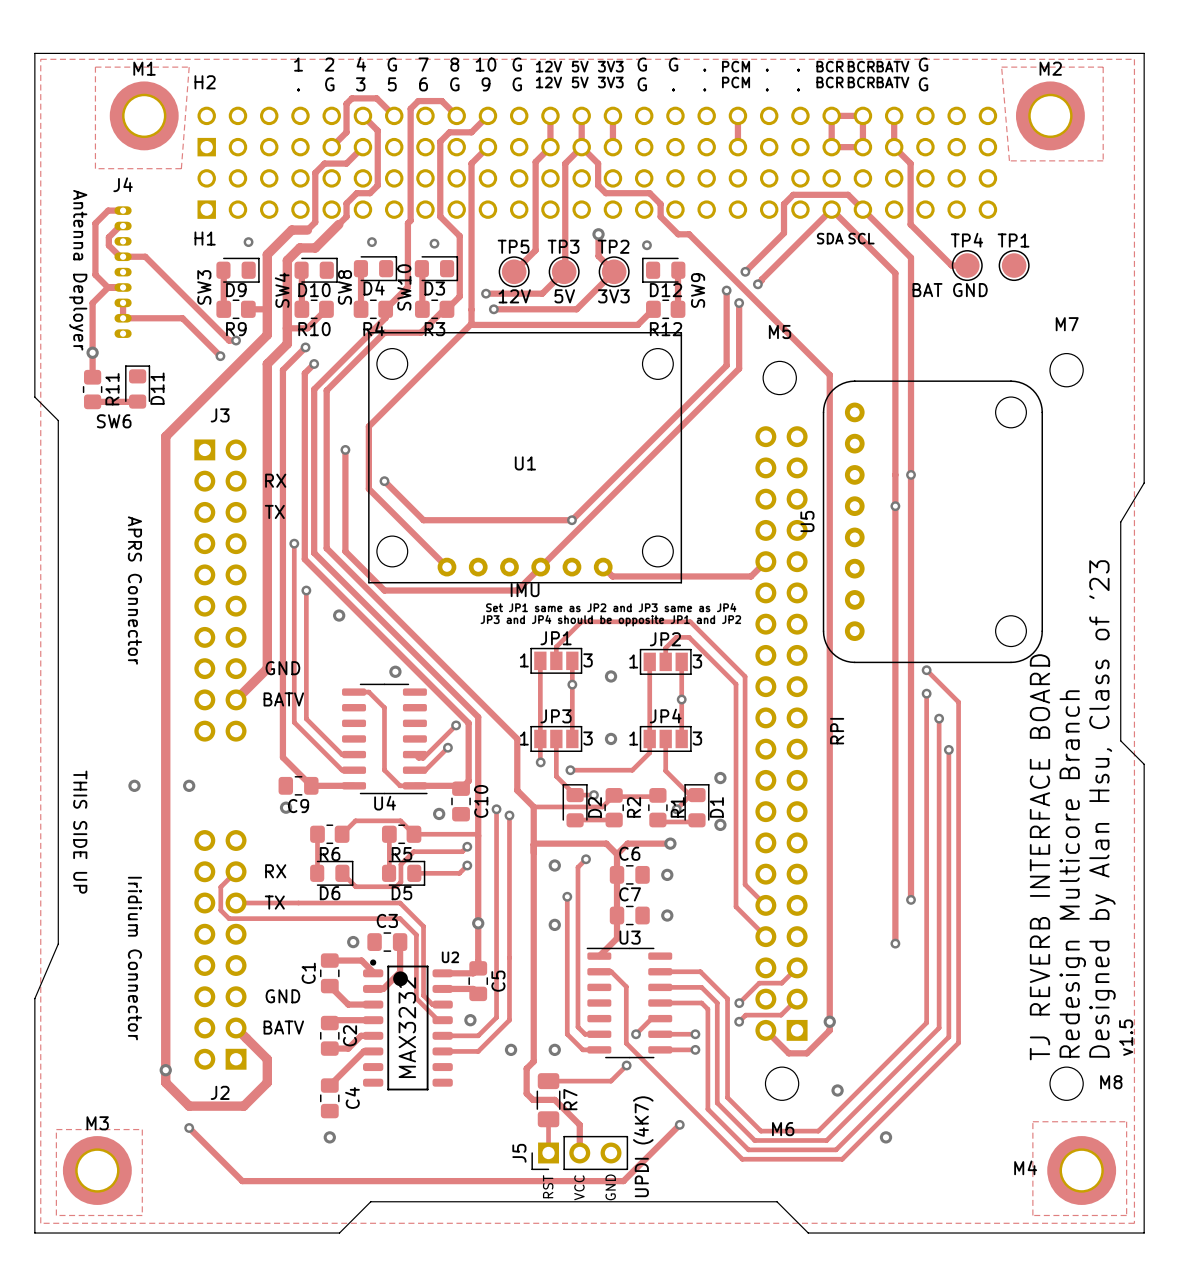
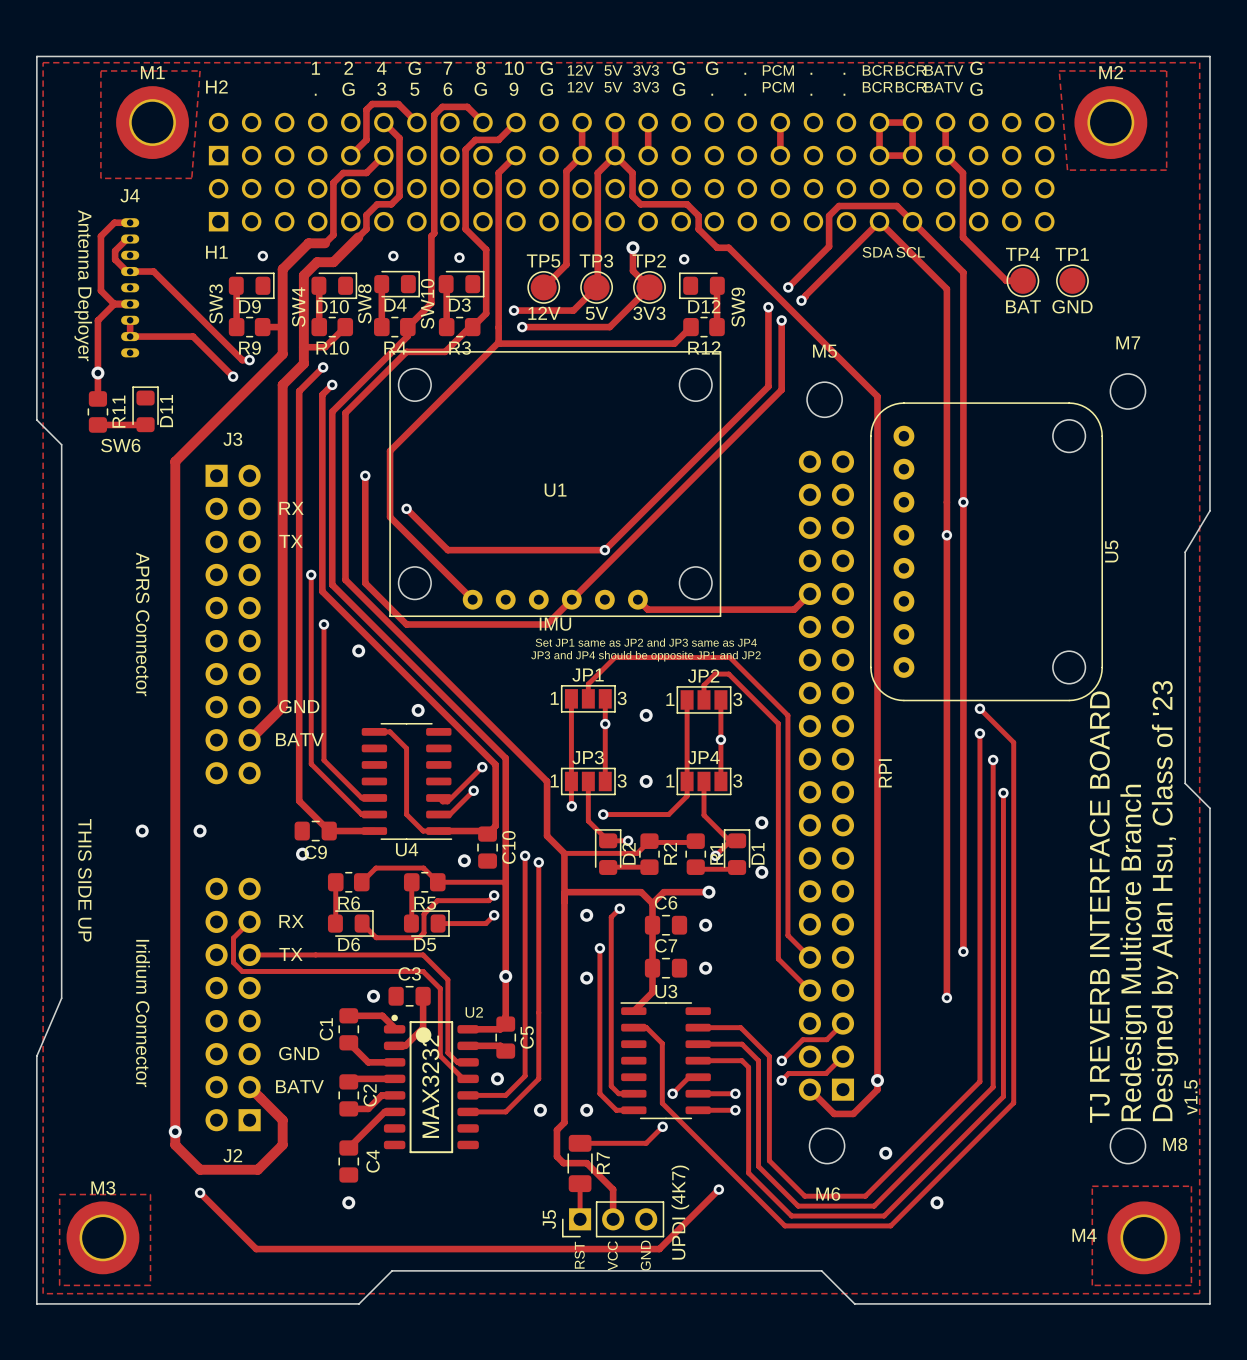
text: BAT (927, 290) -> none
text: GND (970, 290) -> BAT (1023, 306)
text: none -> GND (1072, 306)
U5 name position: U5 (807, 521) -> U5 (1111, 551)

